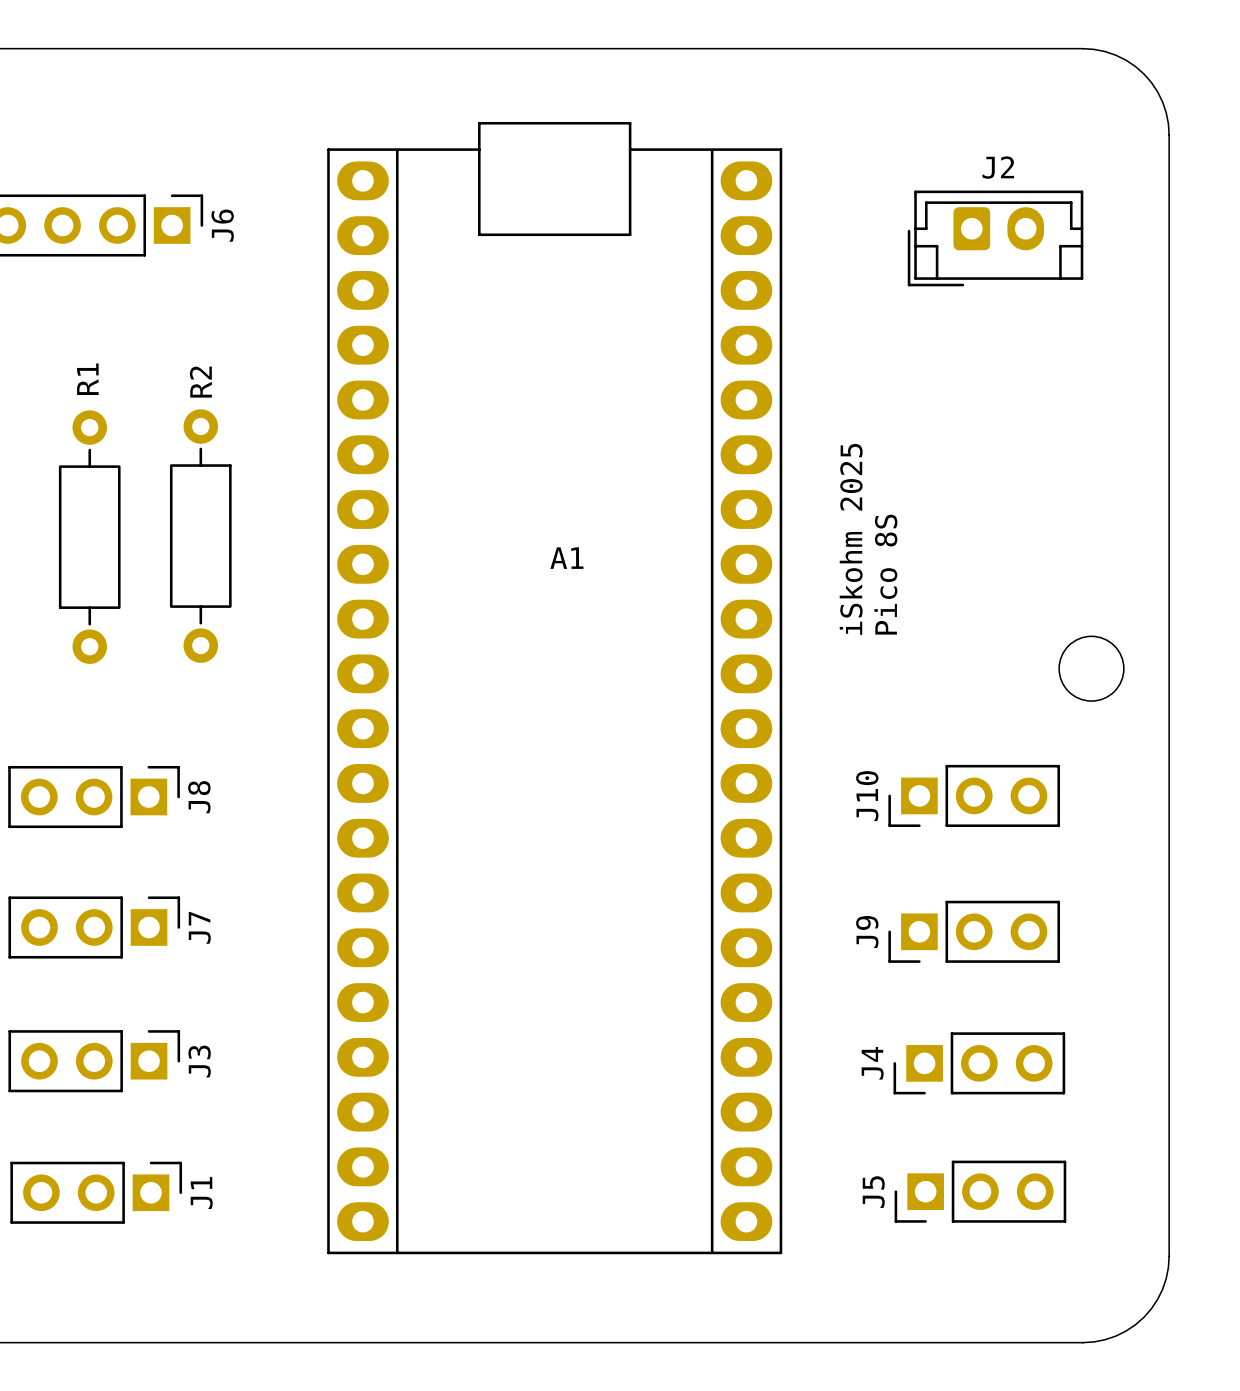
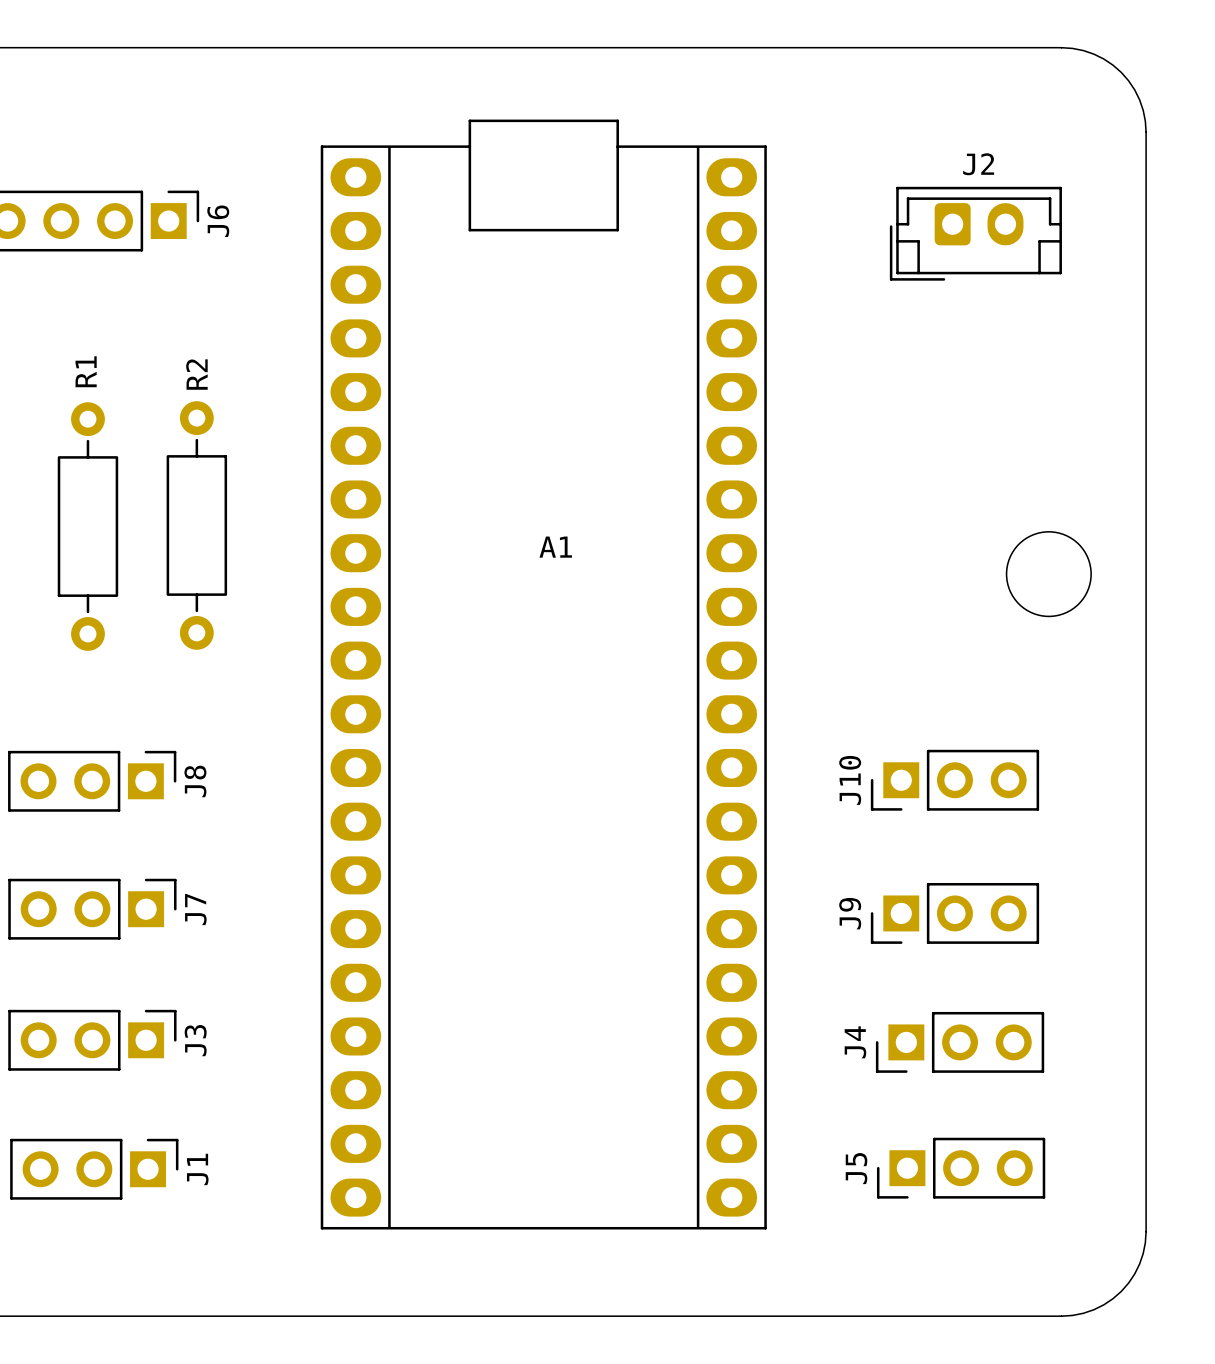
text: iSkohm 2025 (851, 539) -> none
round board edge: none -> [1006, 531, 1092, 617]
text: Pico 8S (885, 574) -> none
round board edge: [1058, 635, 1125, 702] -> none

